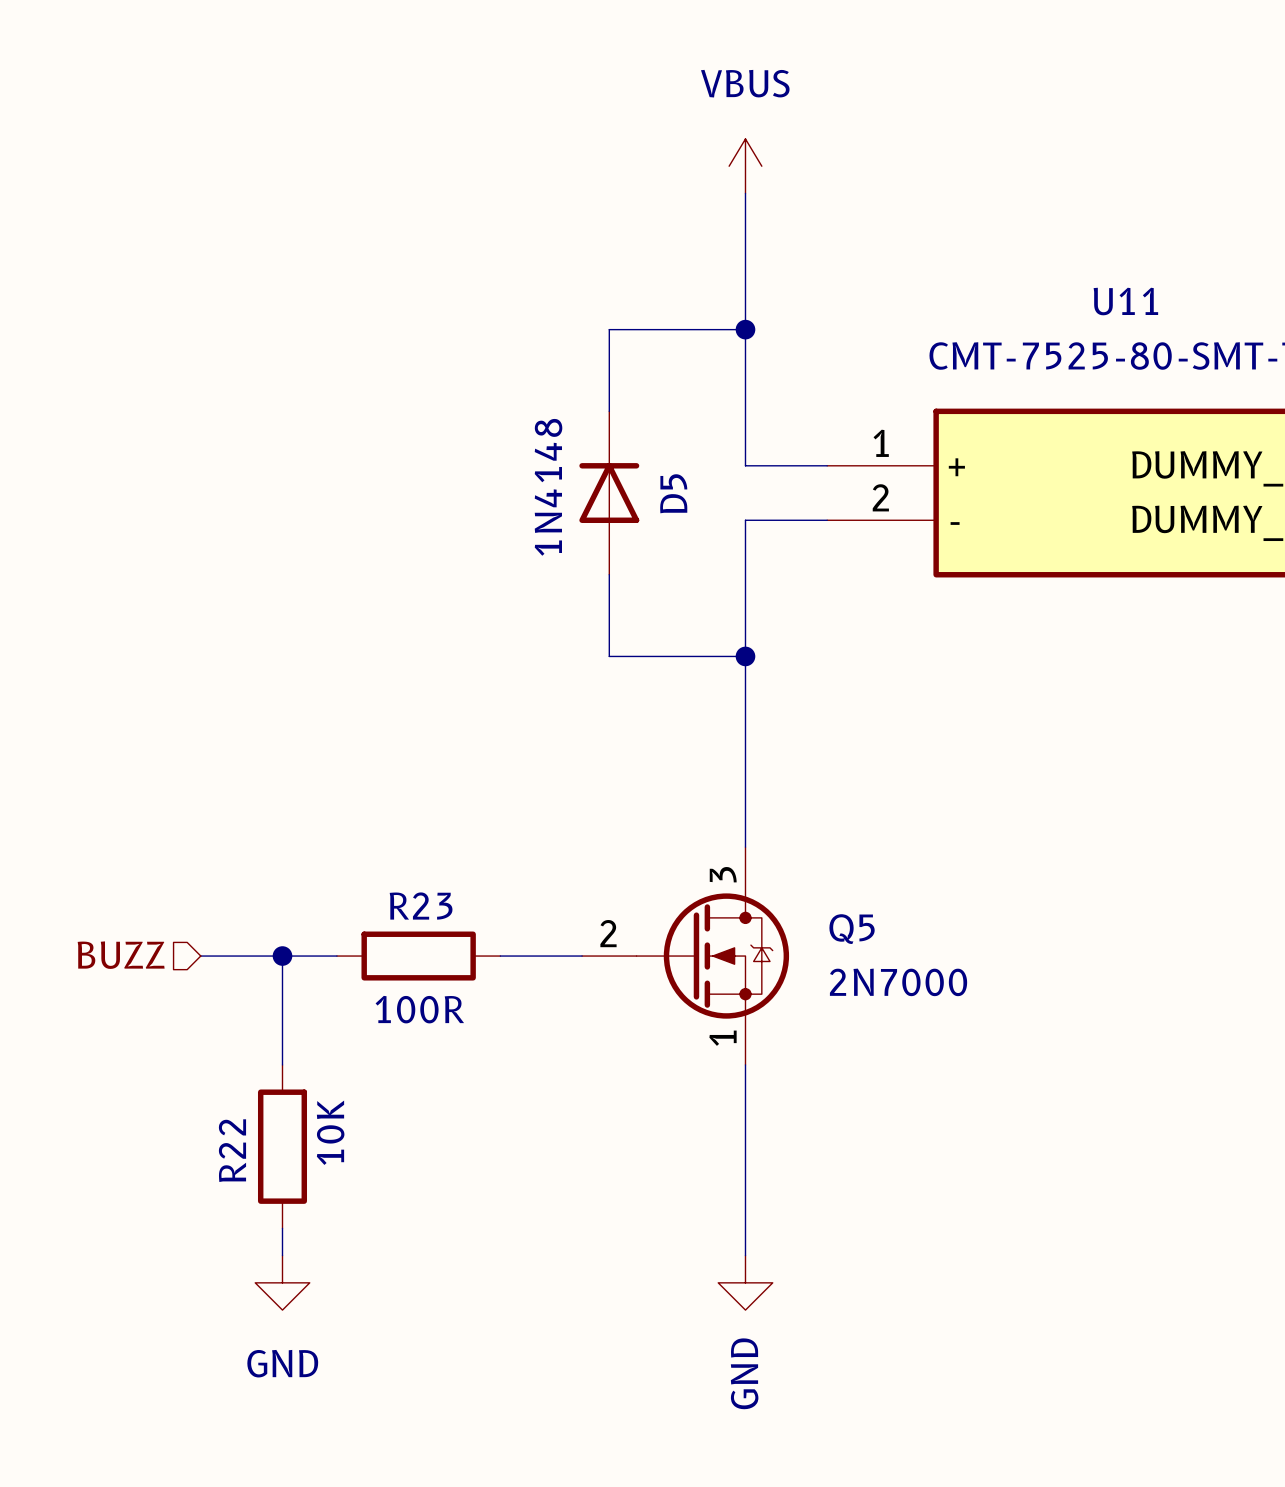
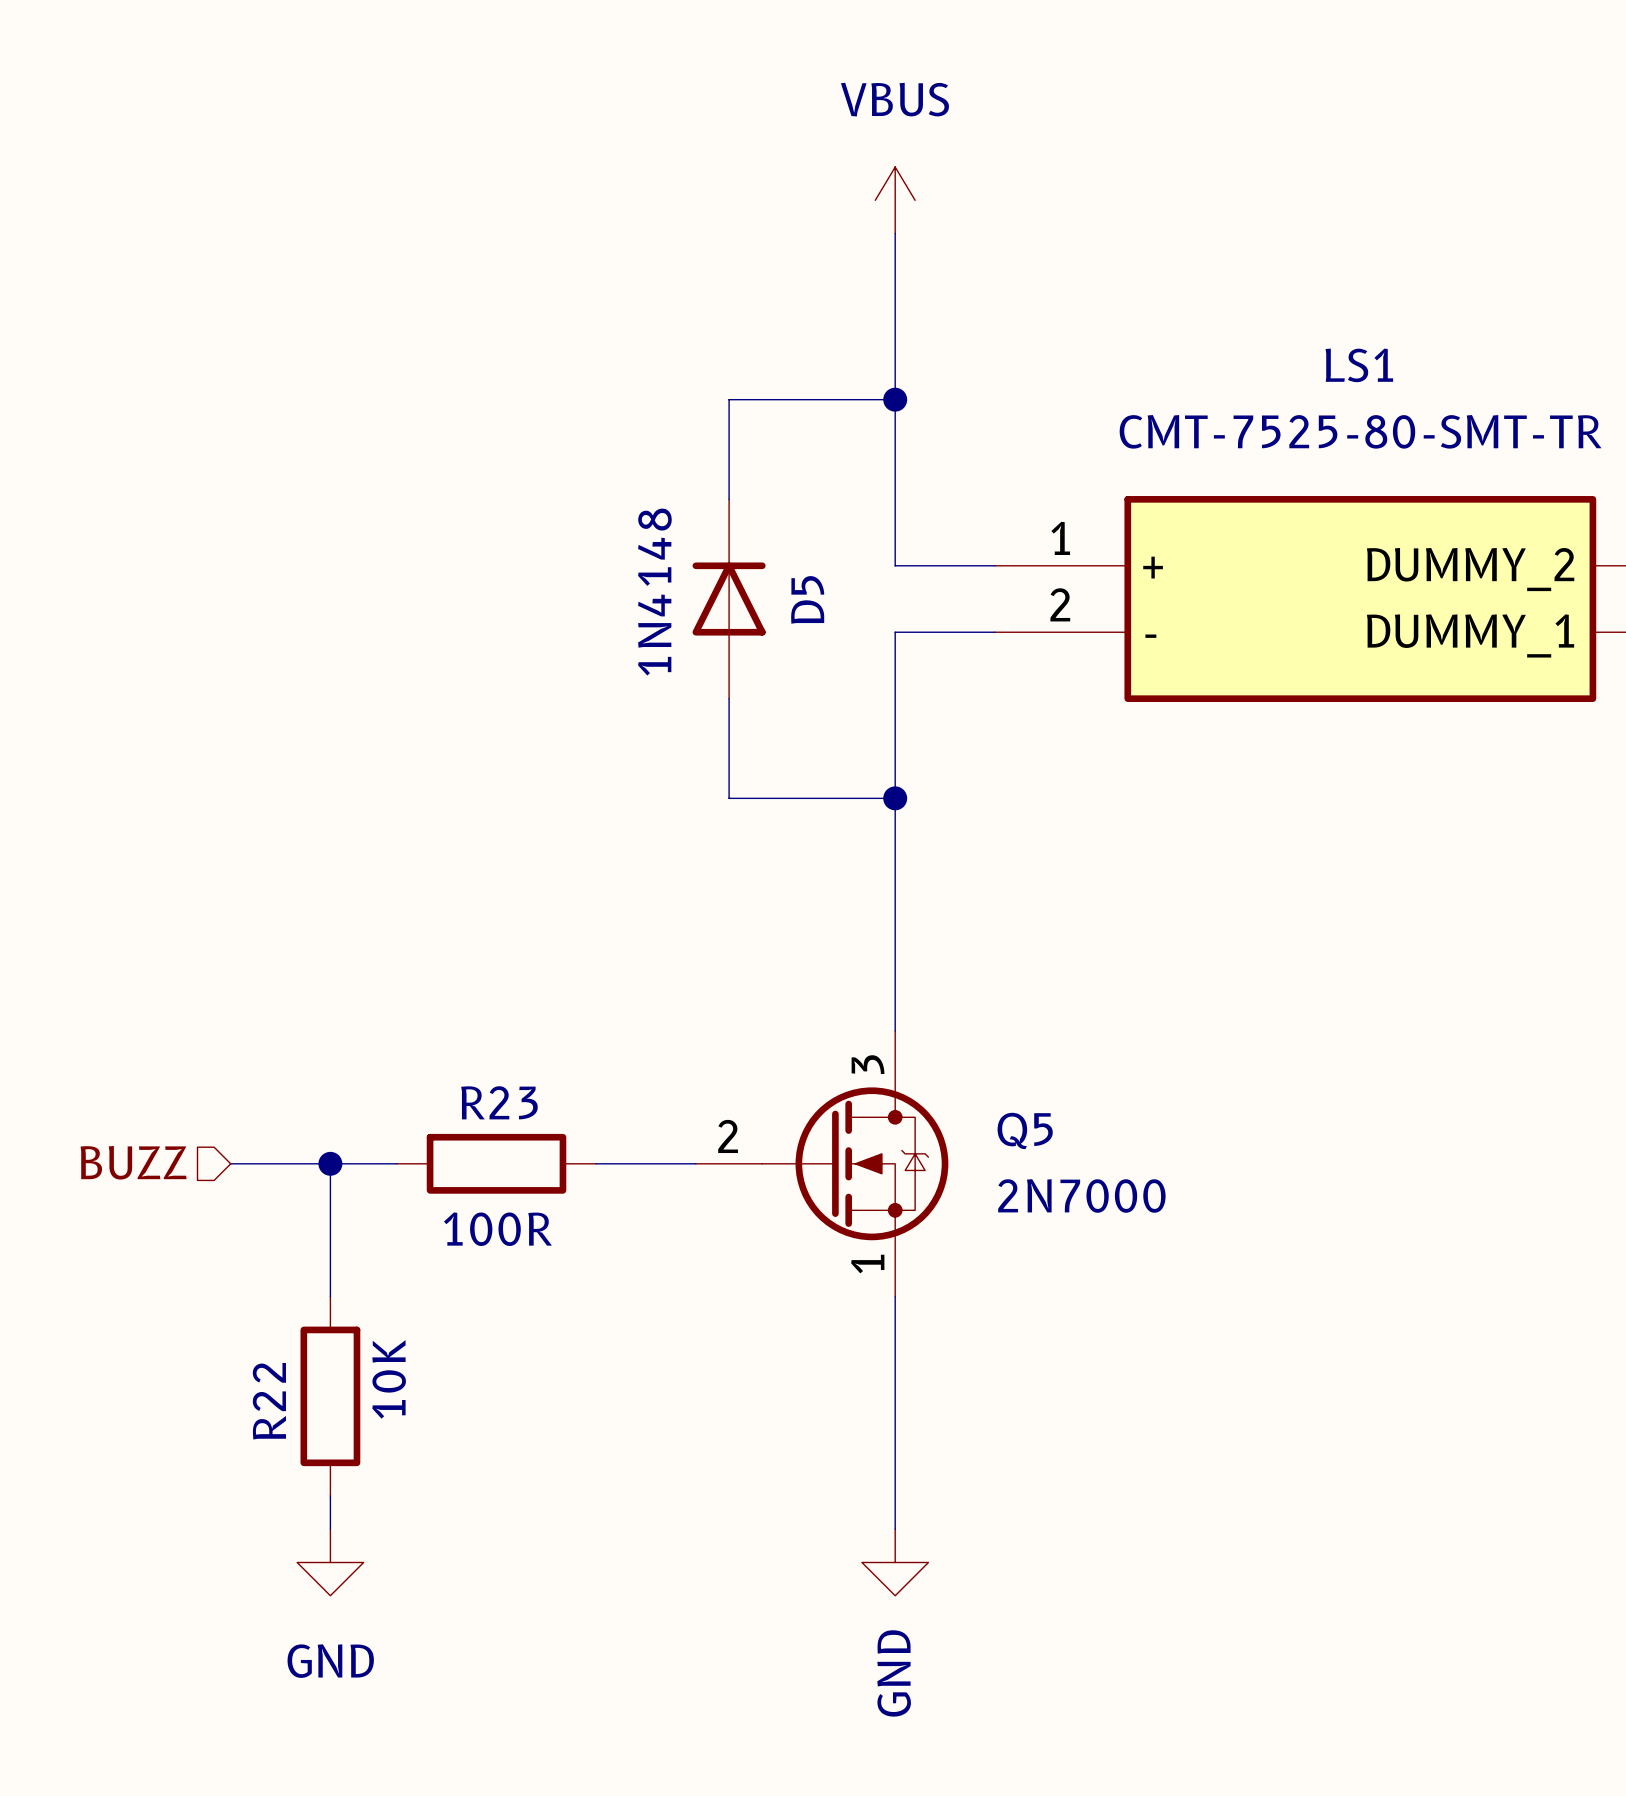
U11 name: U11 (1125, 301) -> LS1 (1359, 365)

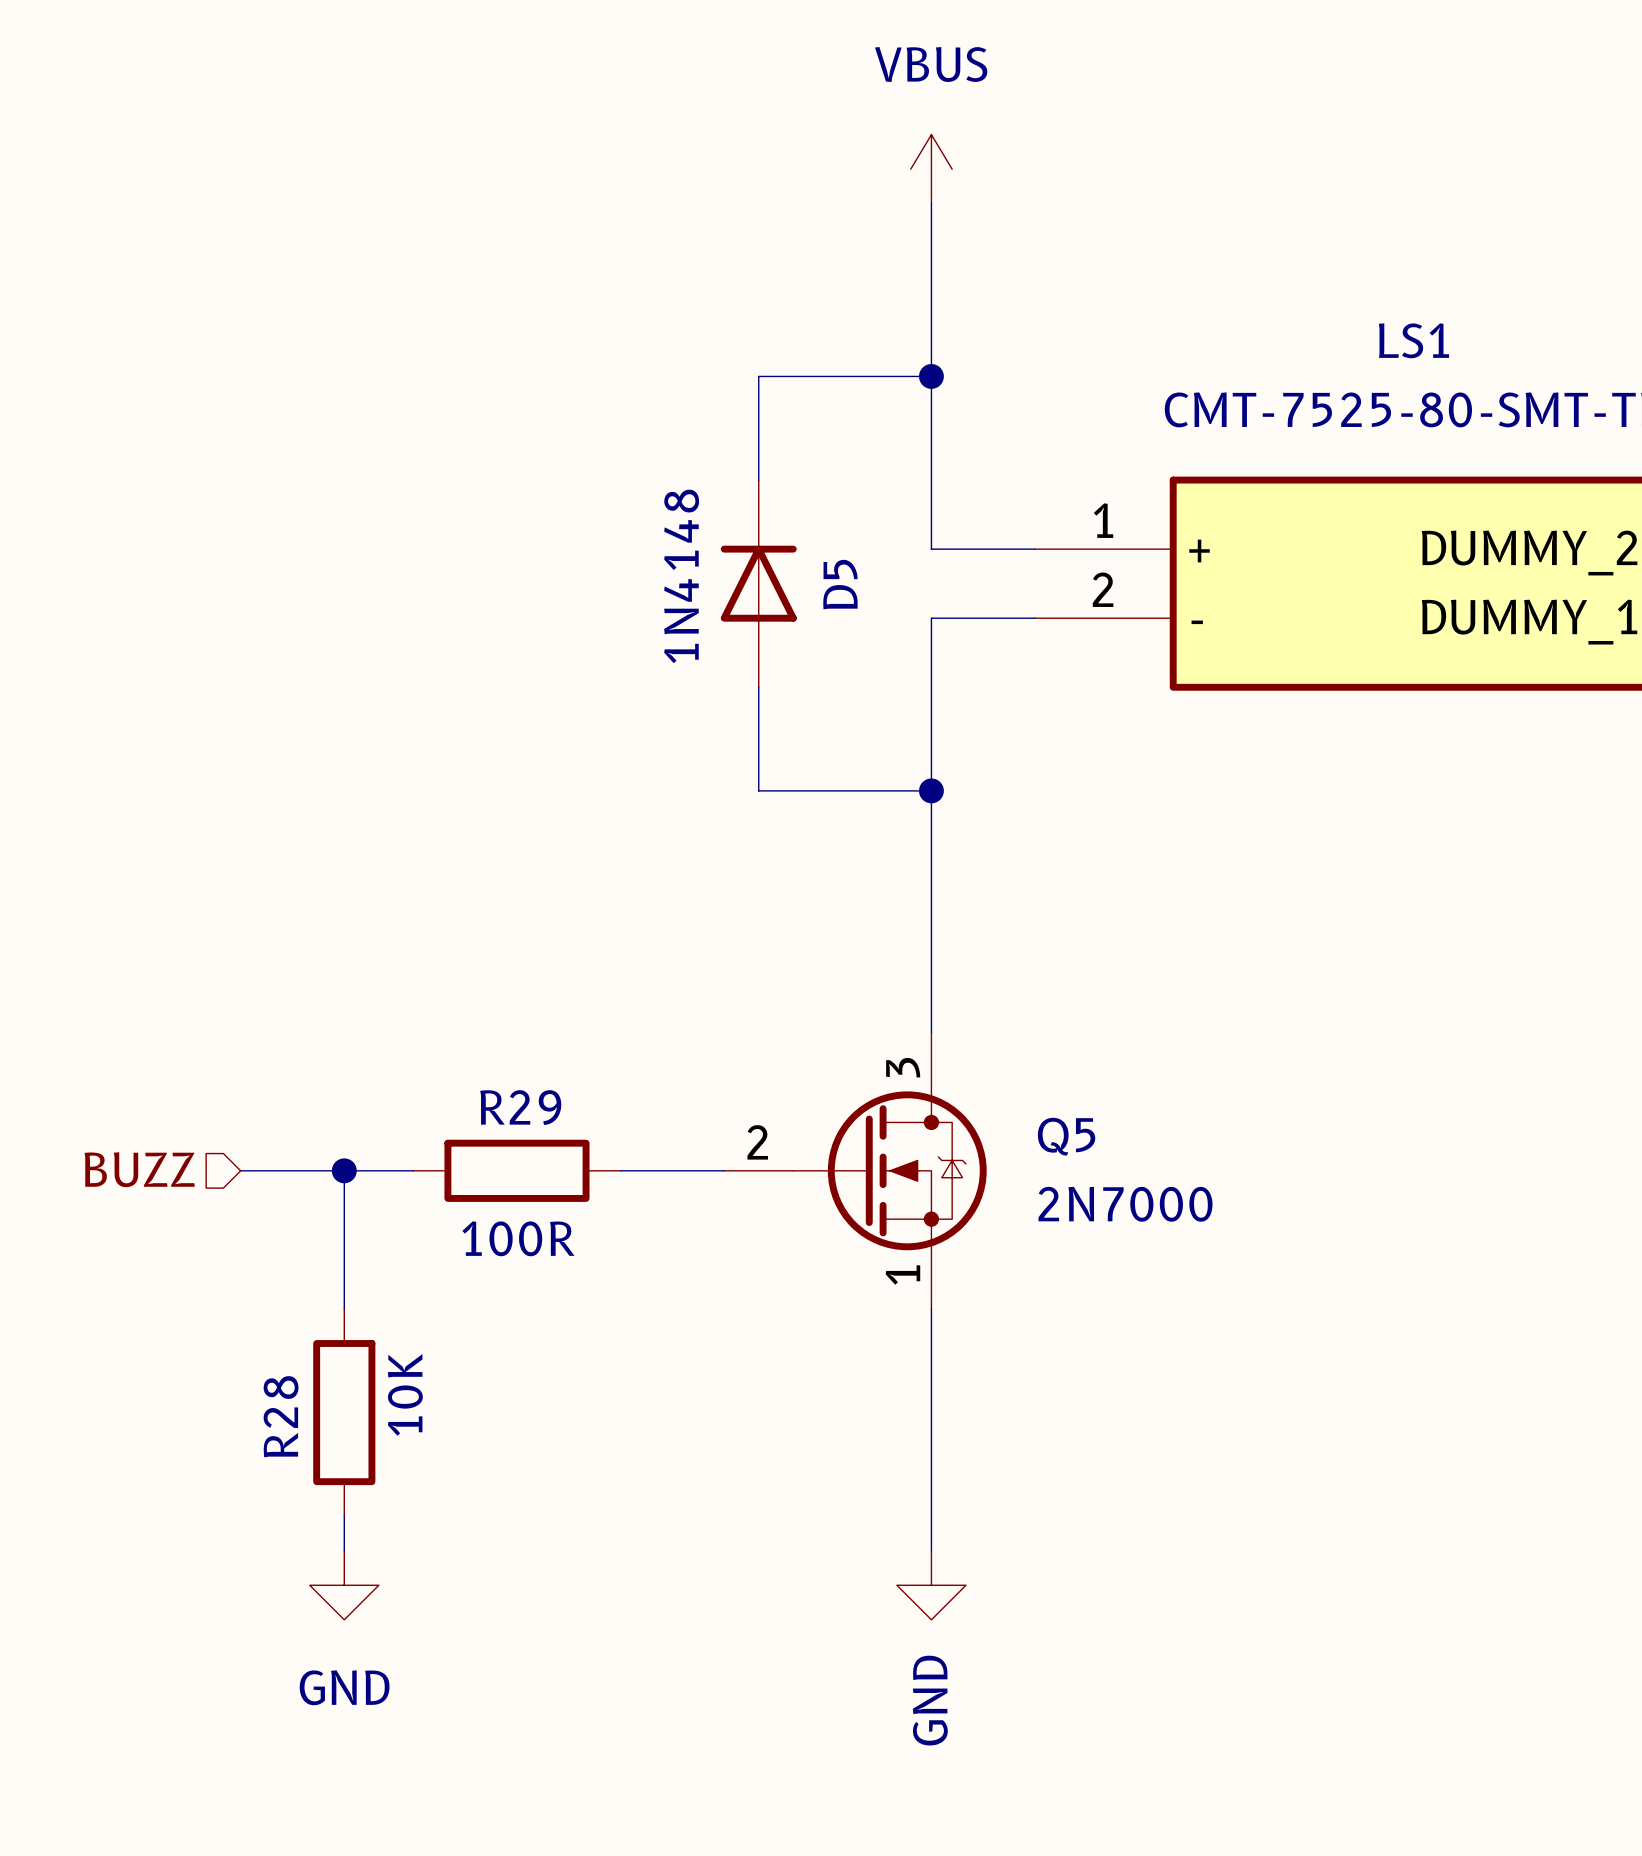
R23 name: R23 (499, 1102) -> R29 (520, 1107)
R22 name: R22 (269, 1401) -> R28 (281, 1416)

